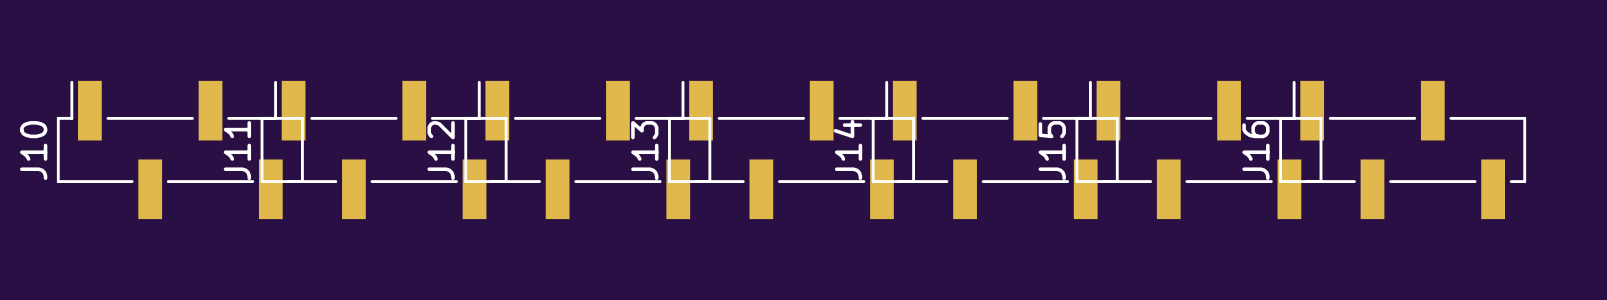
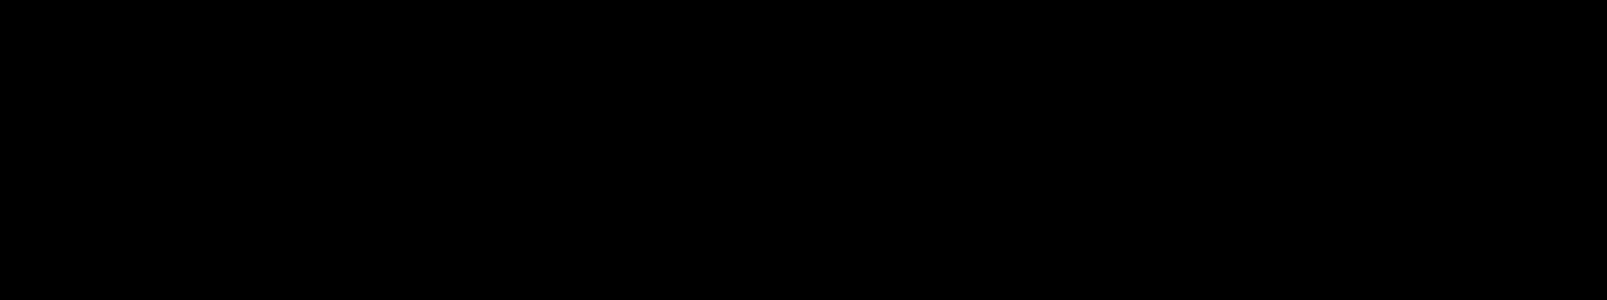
J10: (180, 149) -> none
J11: (384, 149) -> none
J12: (587, 149) -> none
J13: (791, 149) -> none
J14: (995, 149) -> none
J15: (1198, 149) -> none
J16: (1402, 149) -> none

